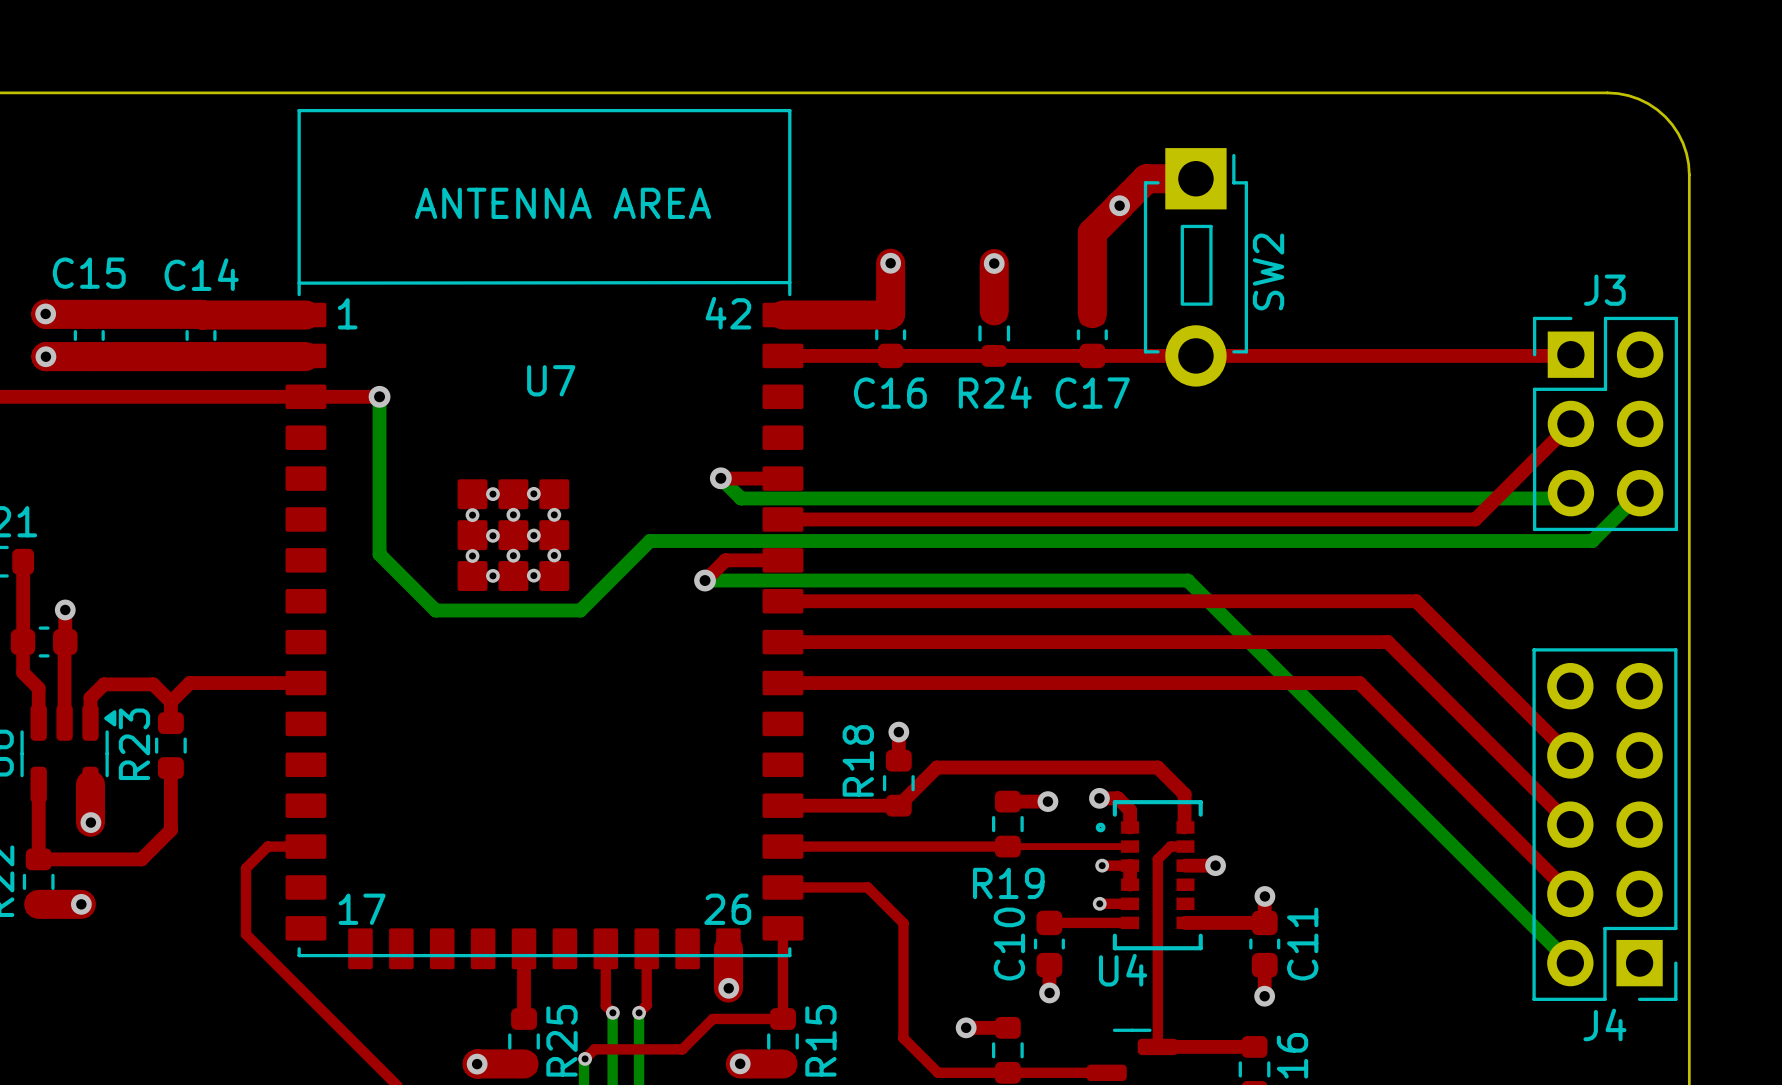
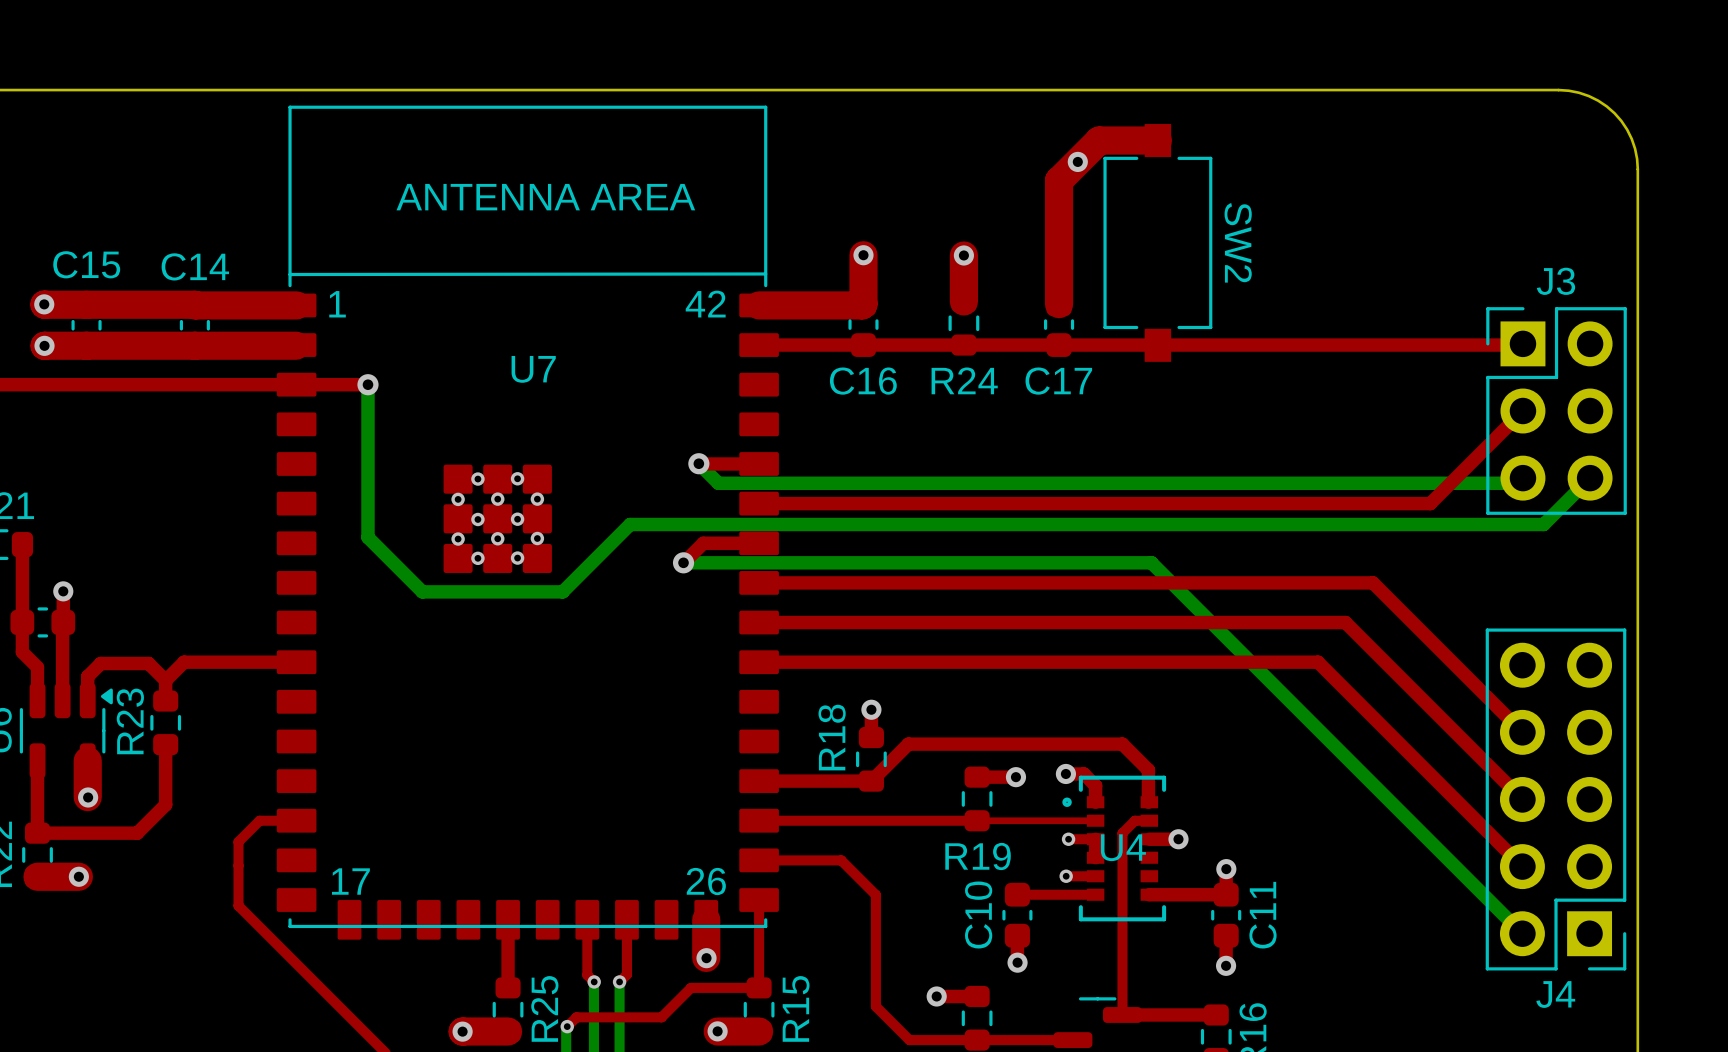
SW2 footprint: [1143, 148, 1249, 387] -> [1103, 124, 1213, 362]
top track: (1195, 178) (1146, 178) (1092, 232) -> (1157, 140) (1099, 140) (1059, 180) (1059, 225)
via position: (1119, 205) -> (1077, 161)
U4 name position: U4 (1123, 970) -> U4 (1123, 847)

